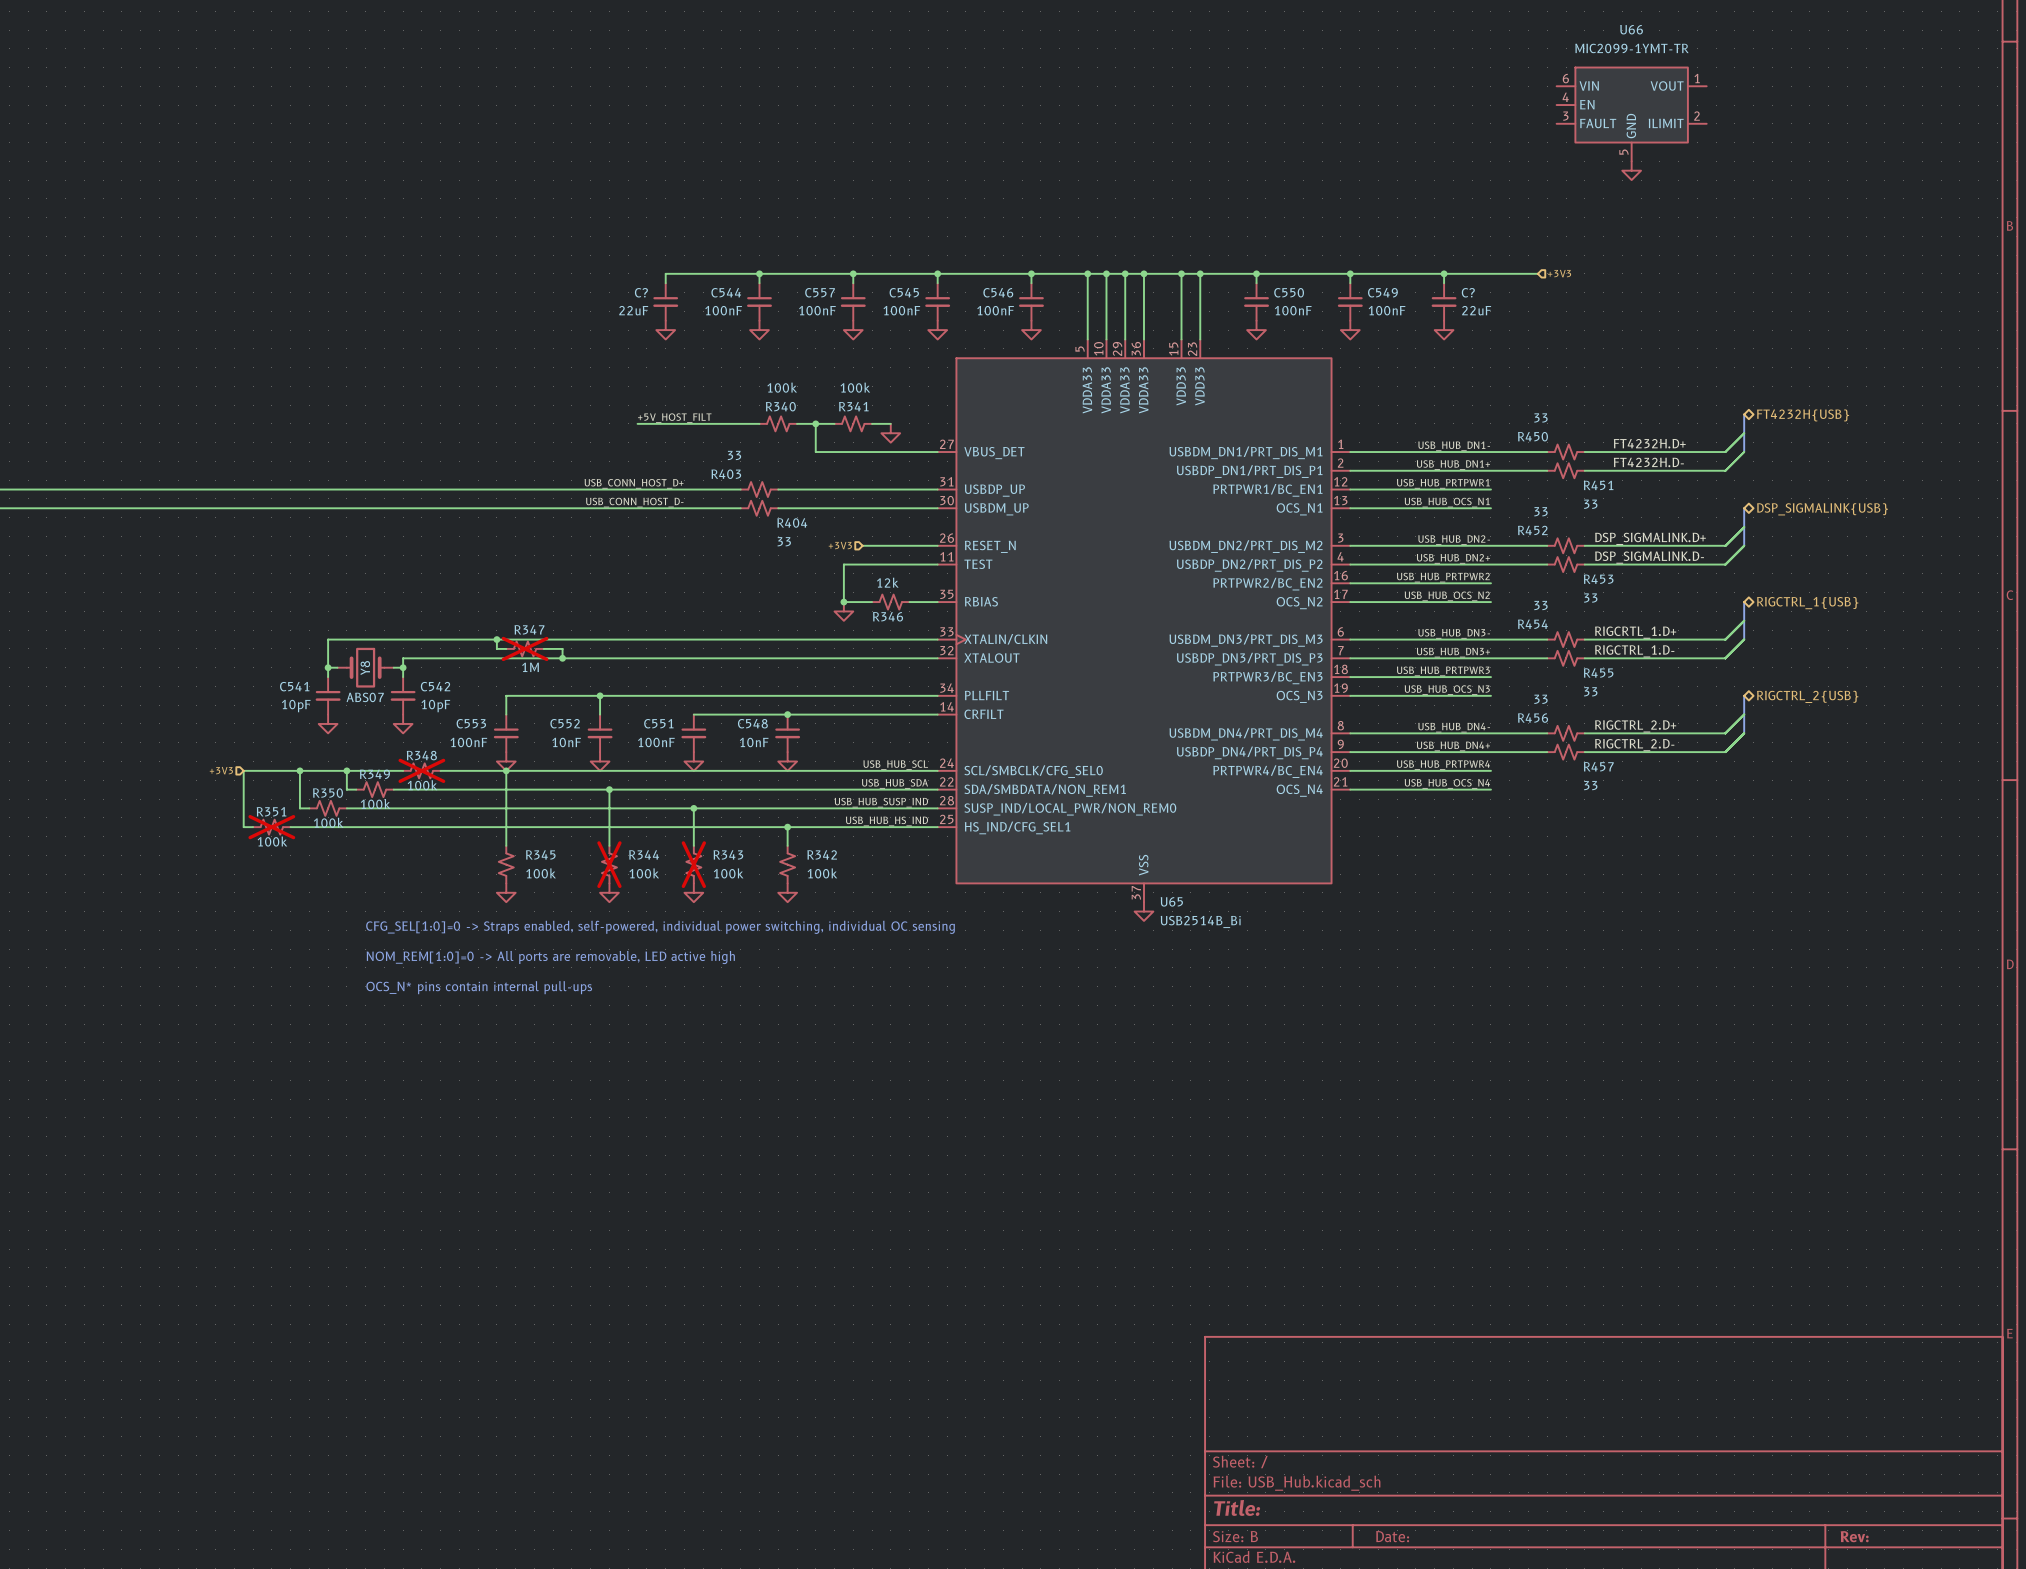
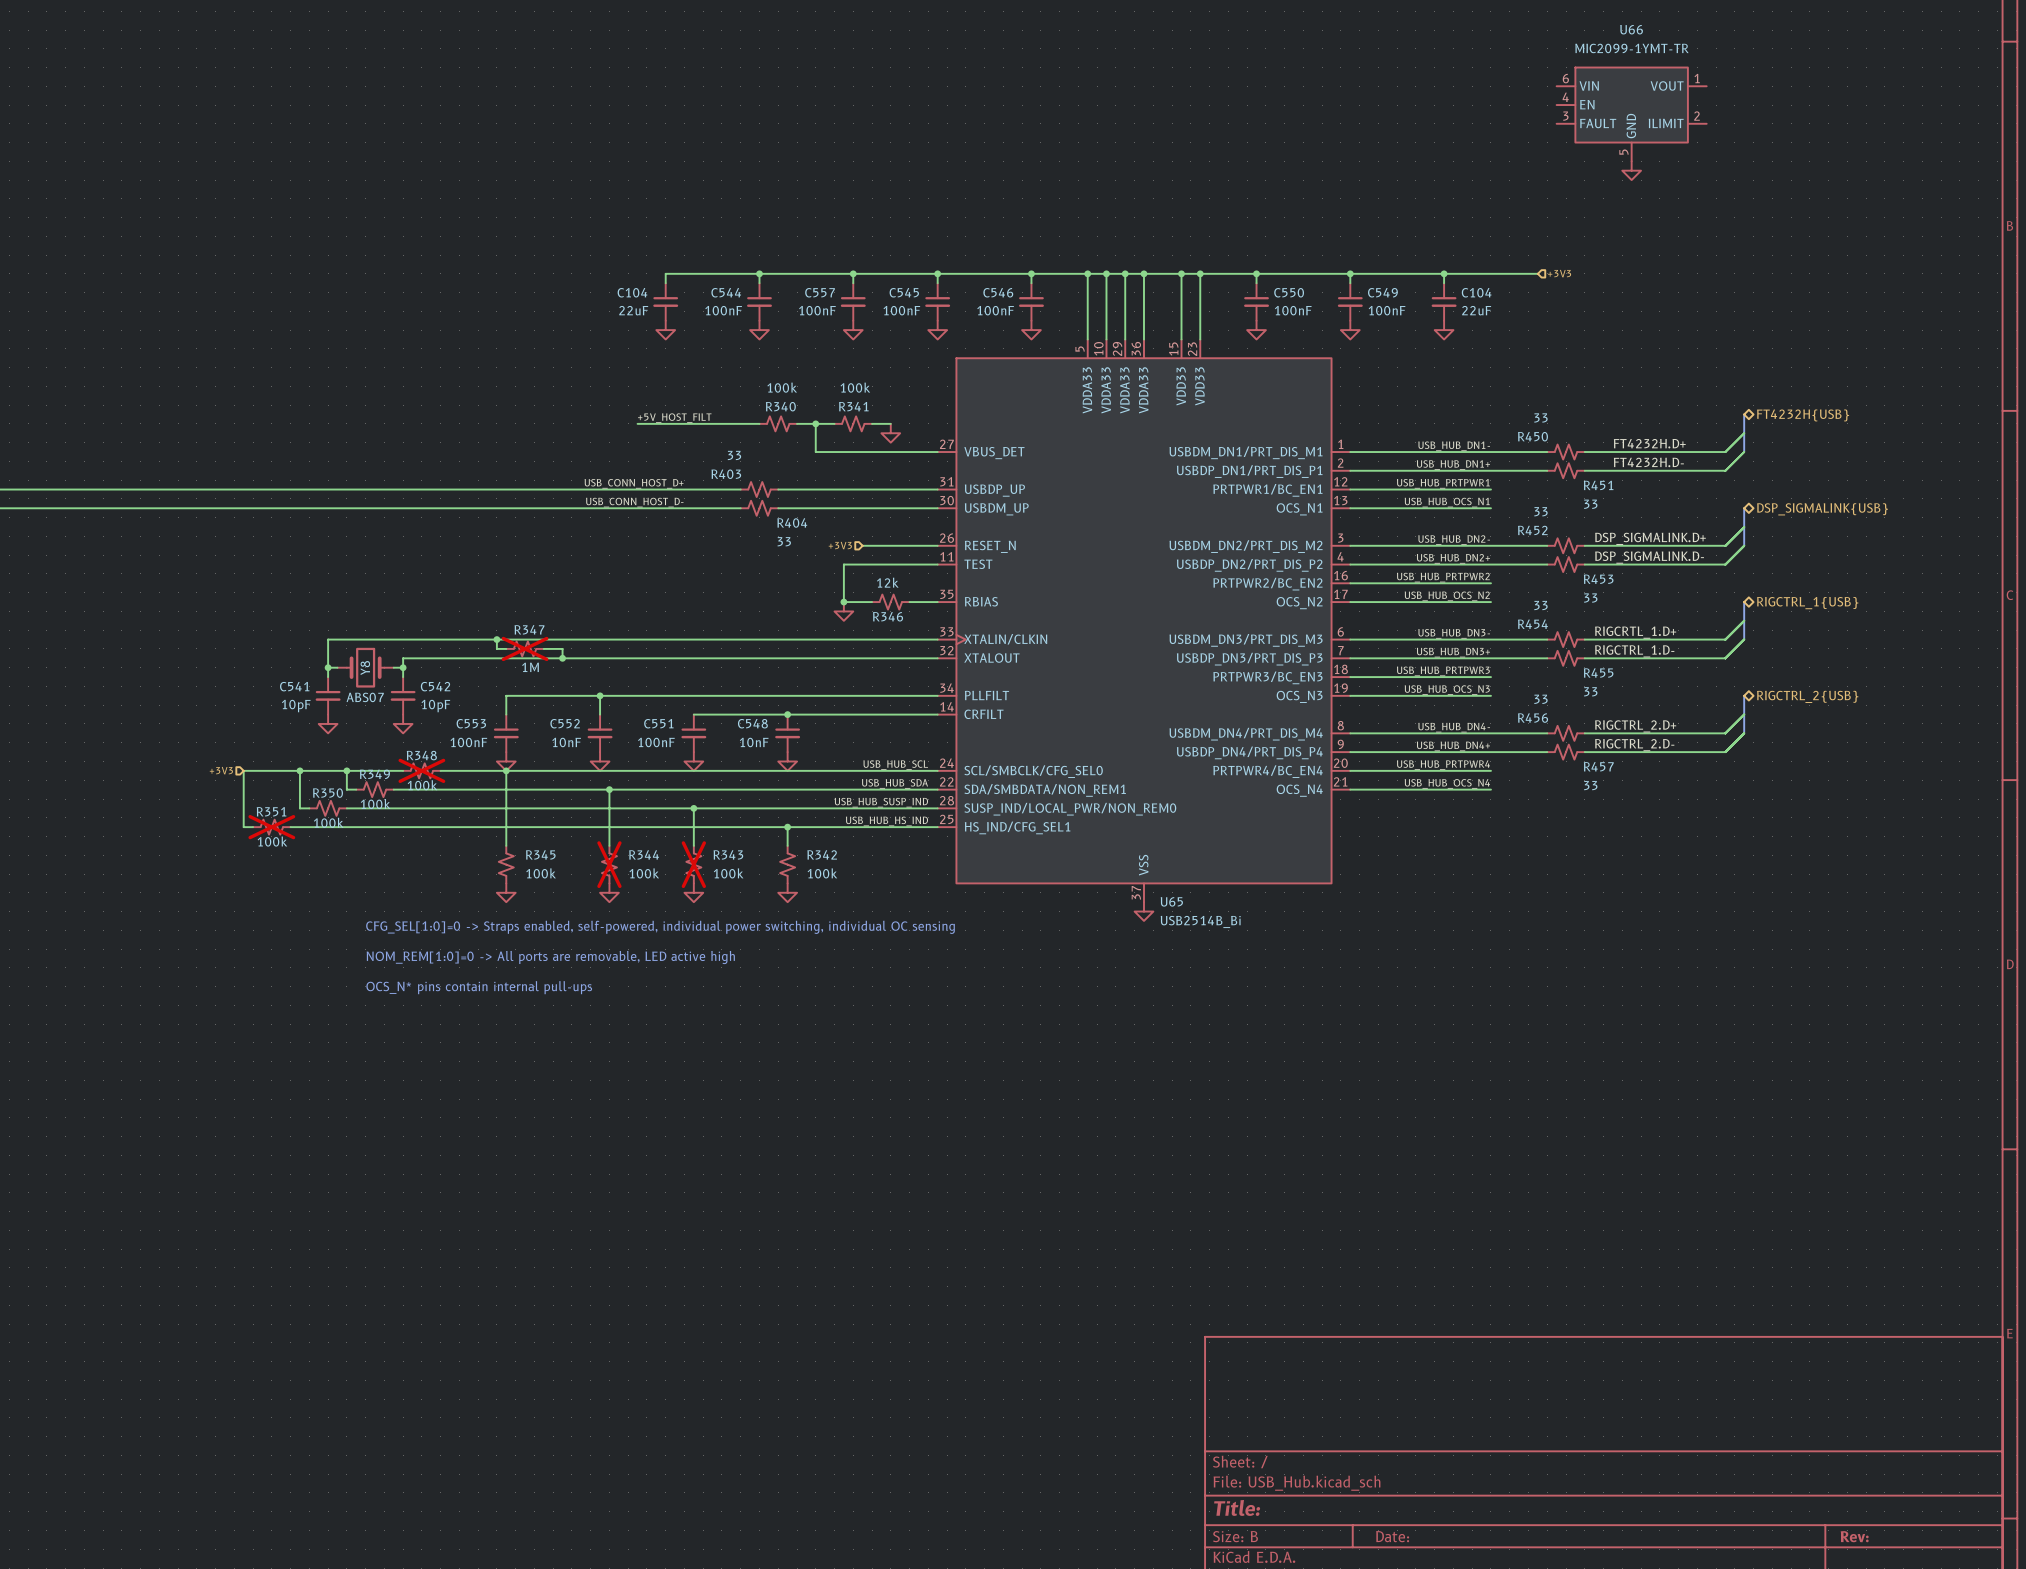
C? name: C? (641, 292) -> C104 (632, 292)
C? name: C? (1468, 292) -> C104 (1476, 292)

